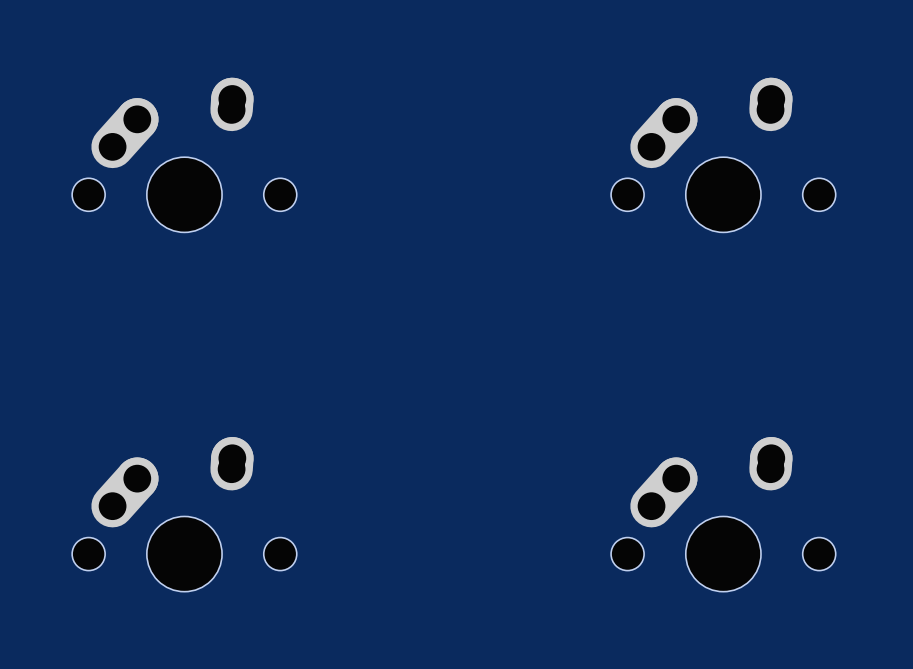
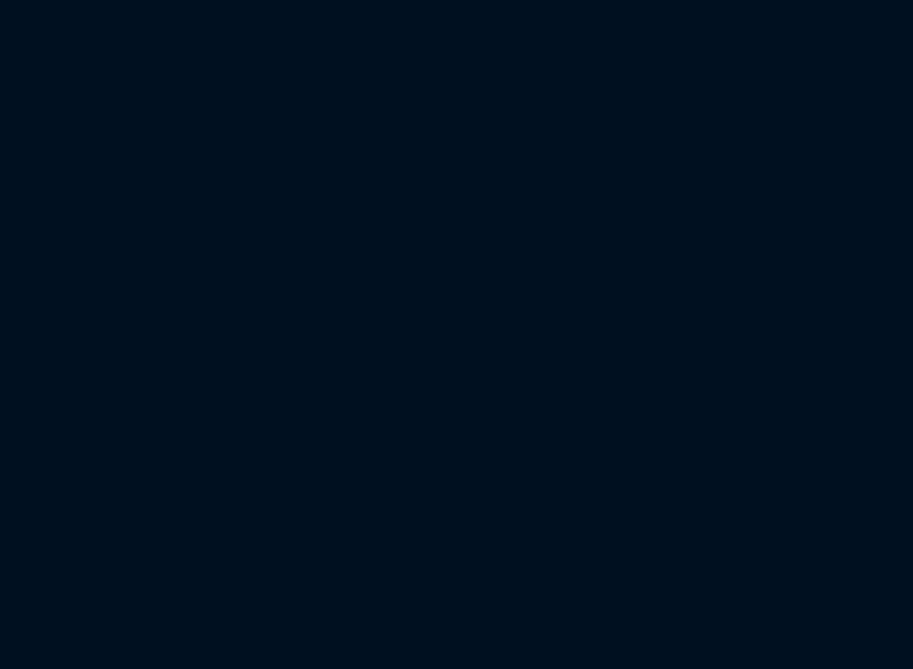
part: (184, 155) -> none
part: (723, 155) -> none
part: (184, 514) -> none
part: (723, 514) -> none

